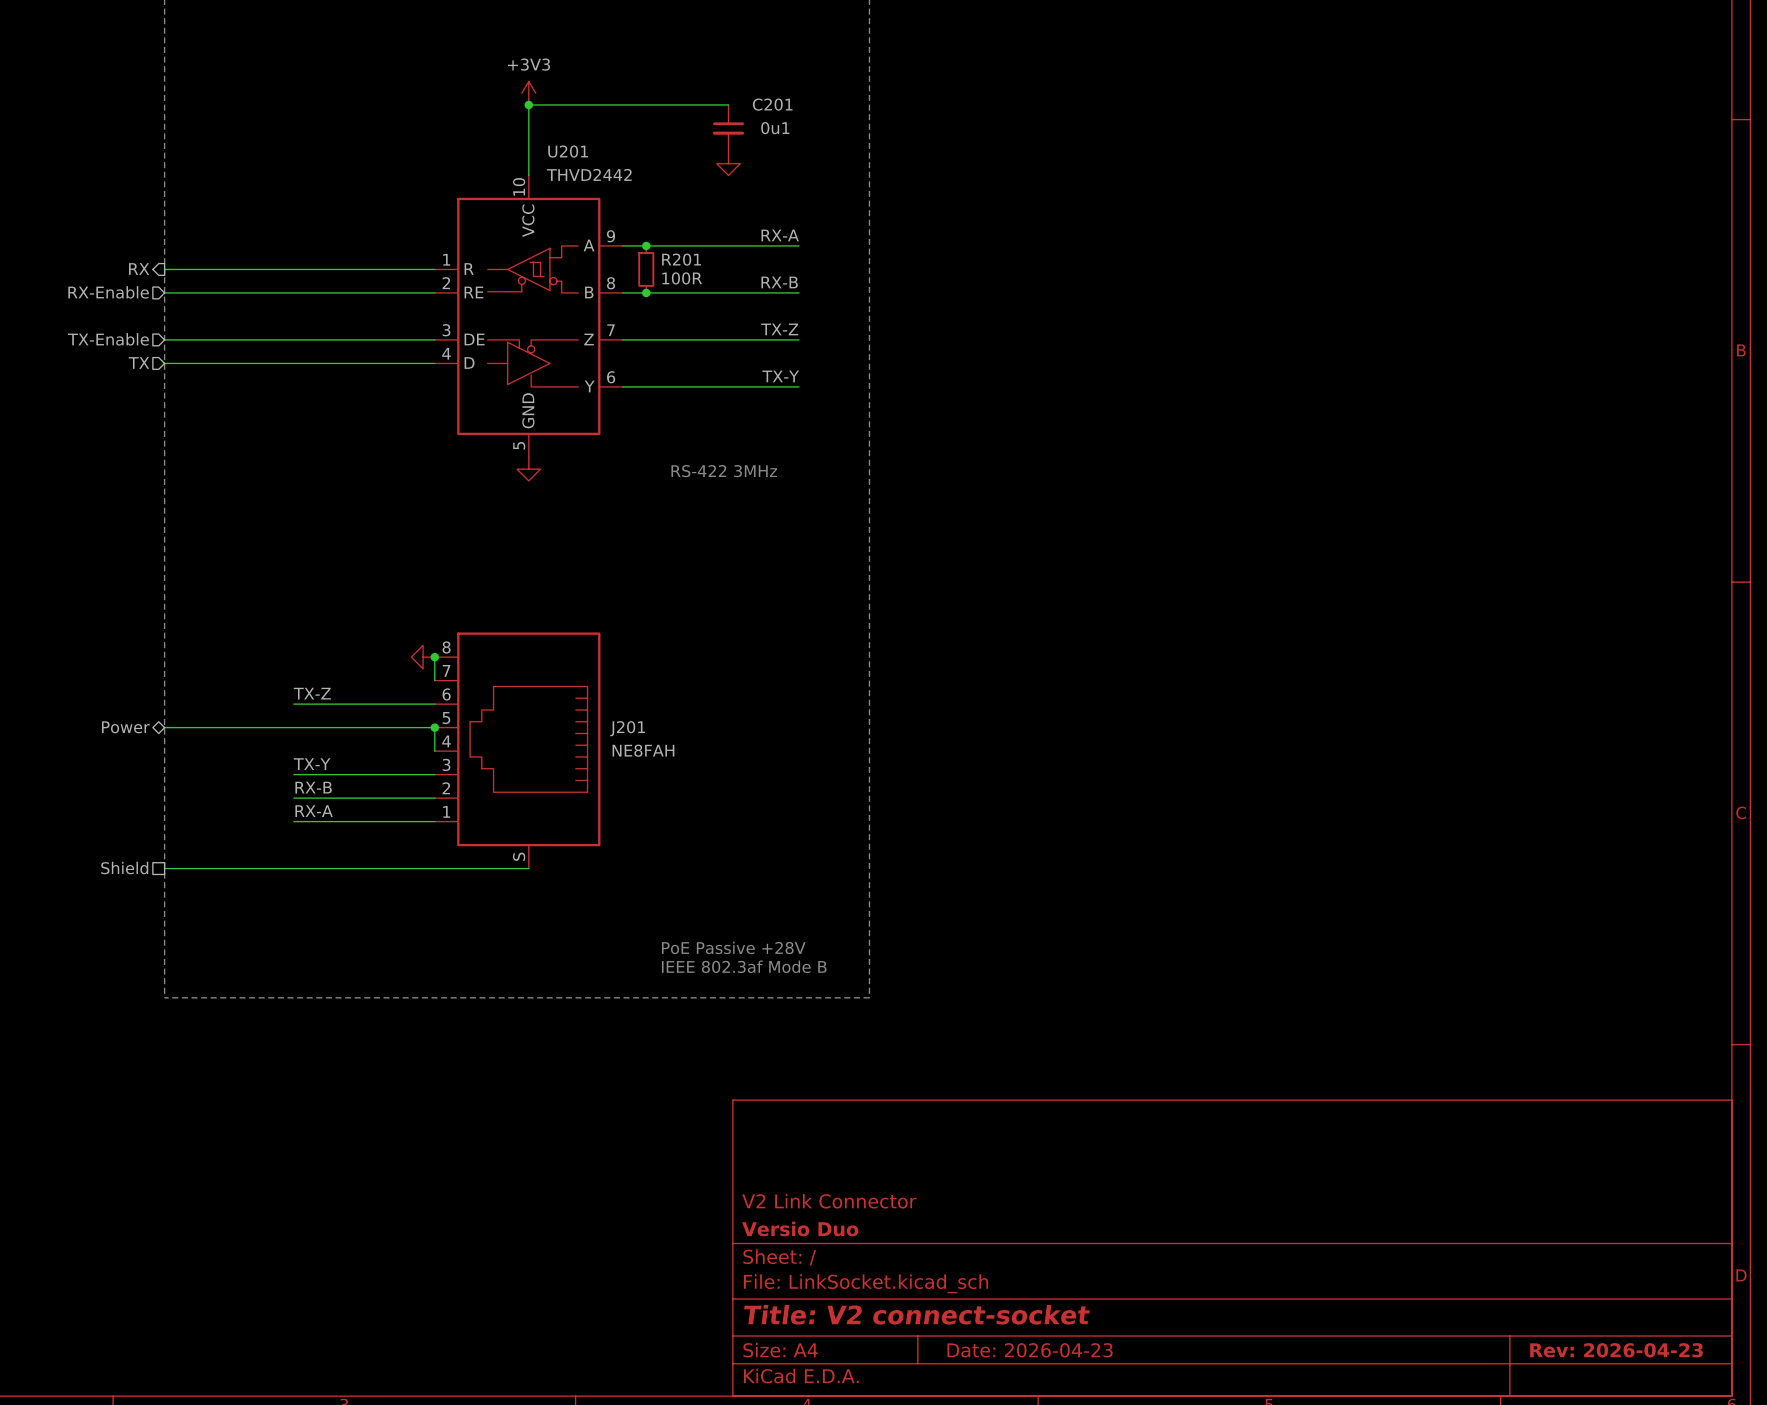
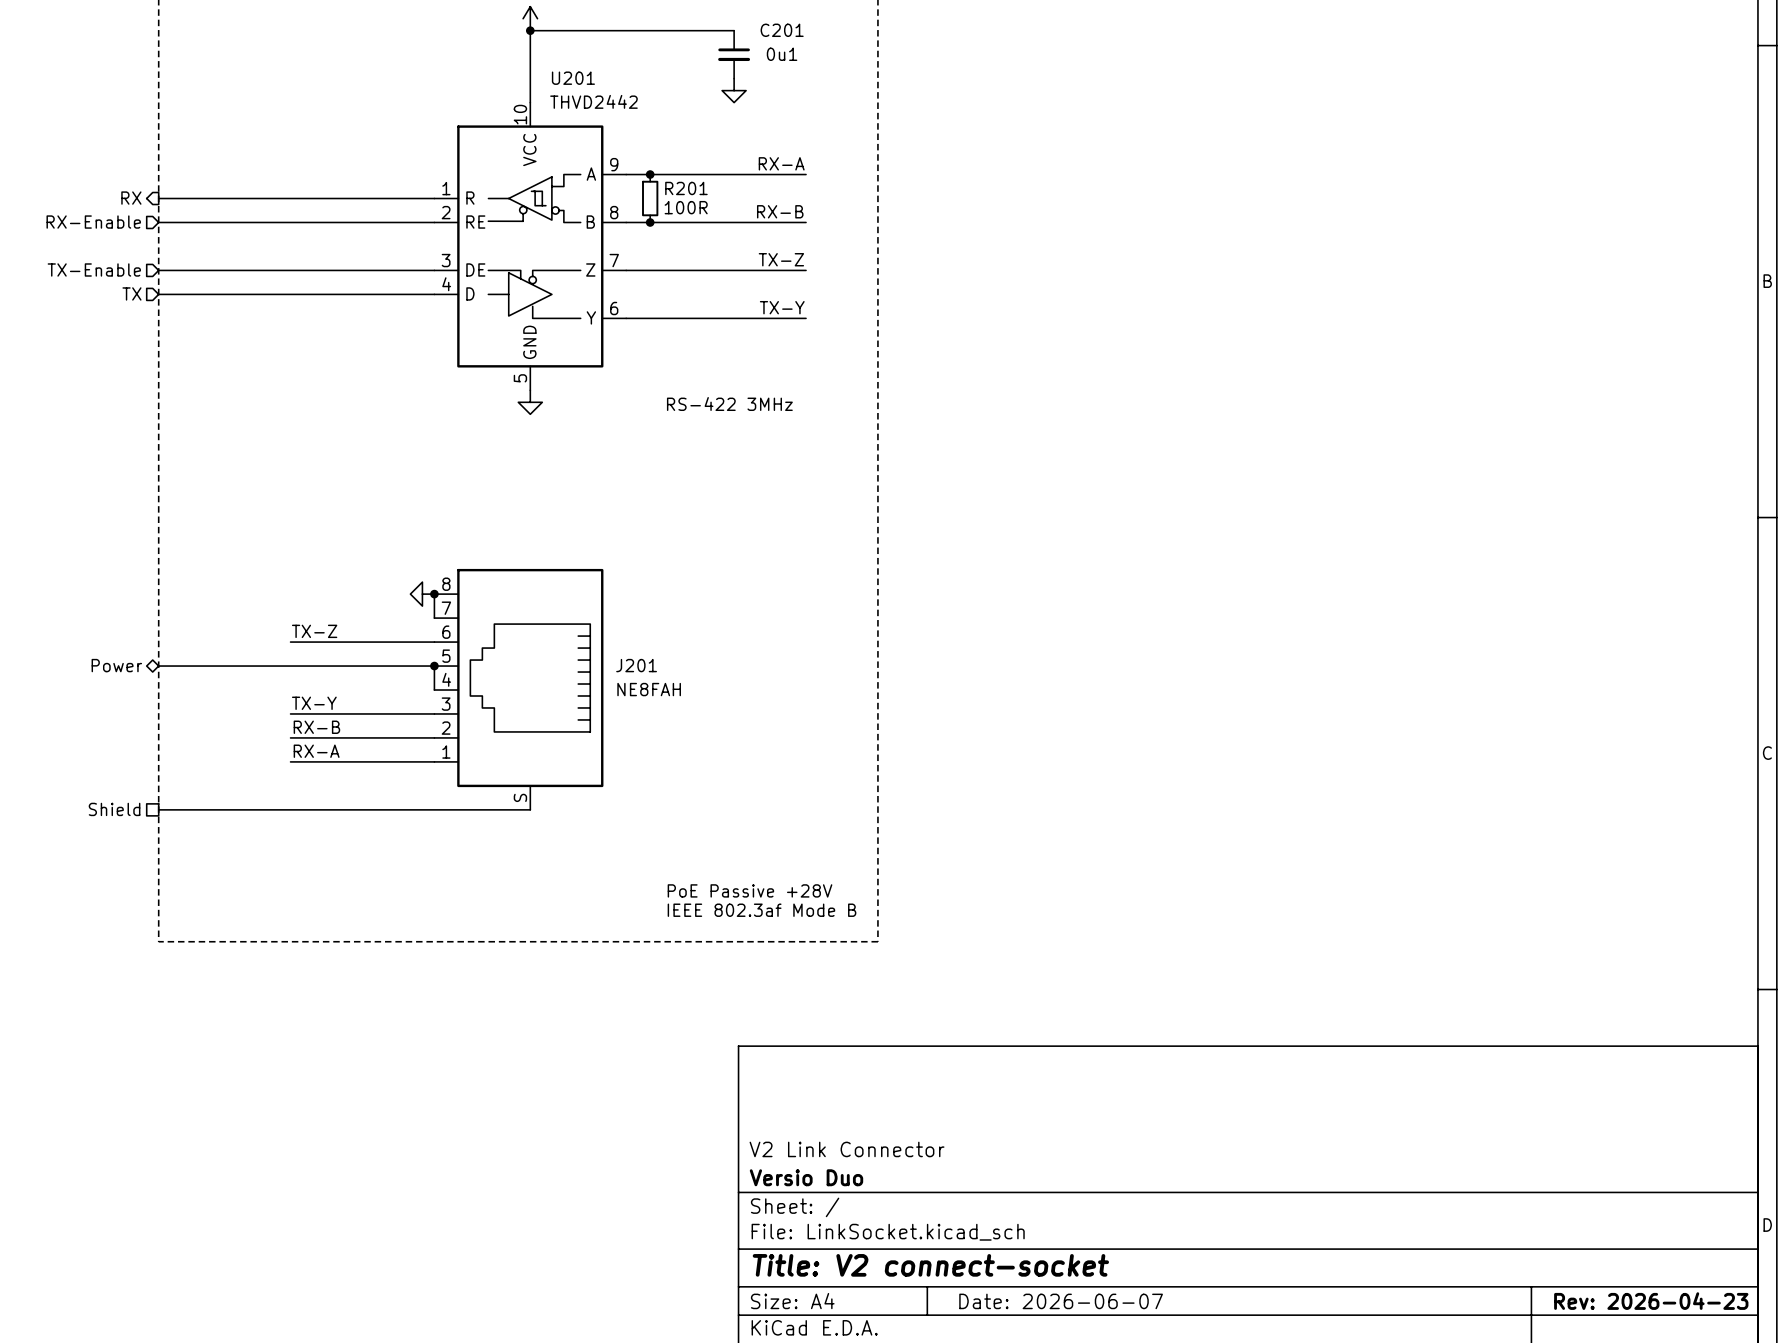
title block: Date: 2026-04-23 (1030, 1350) -> Date: 2026-06-07 (1061, 1301)

